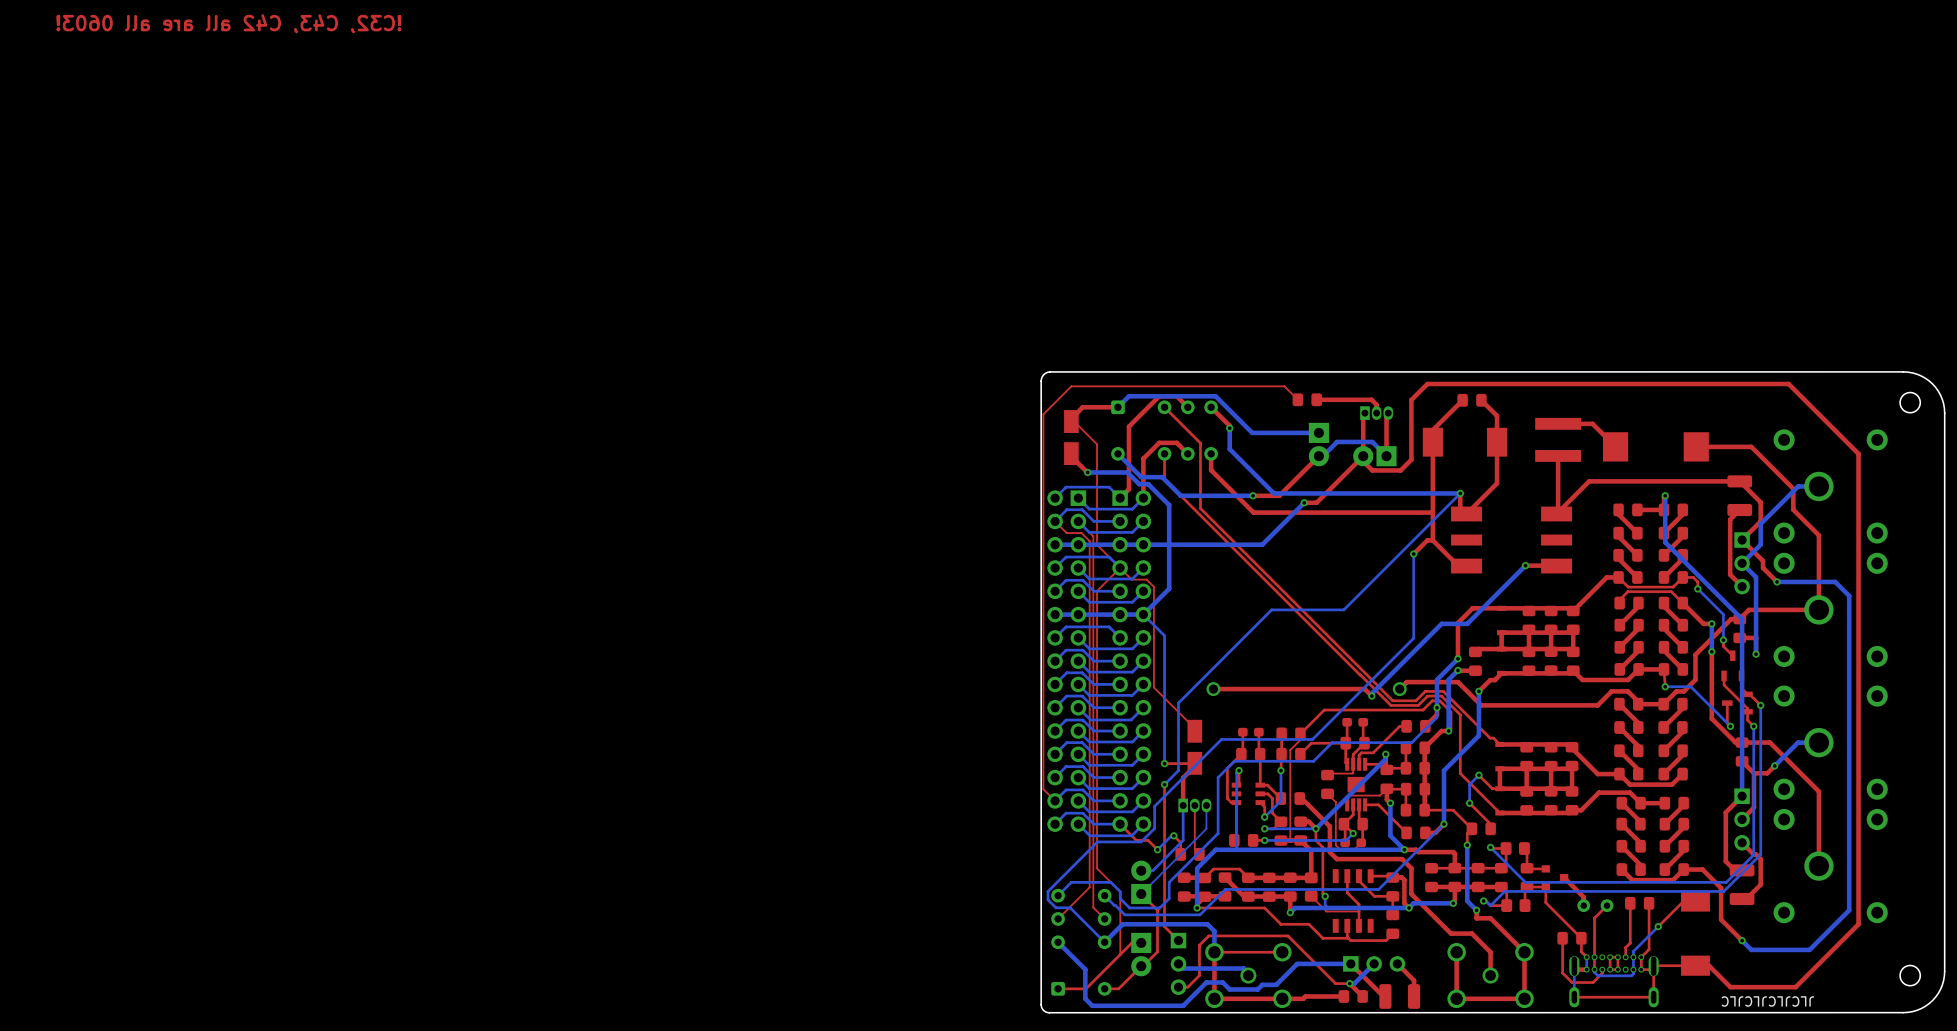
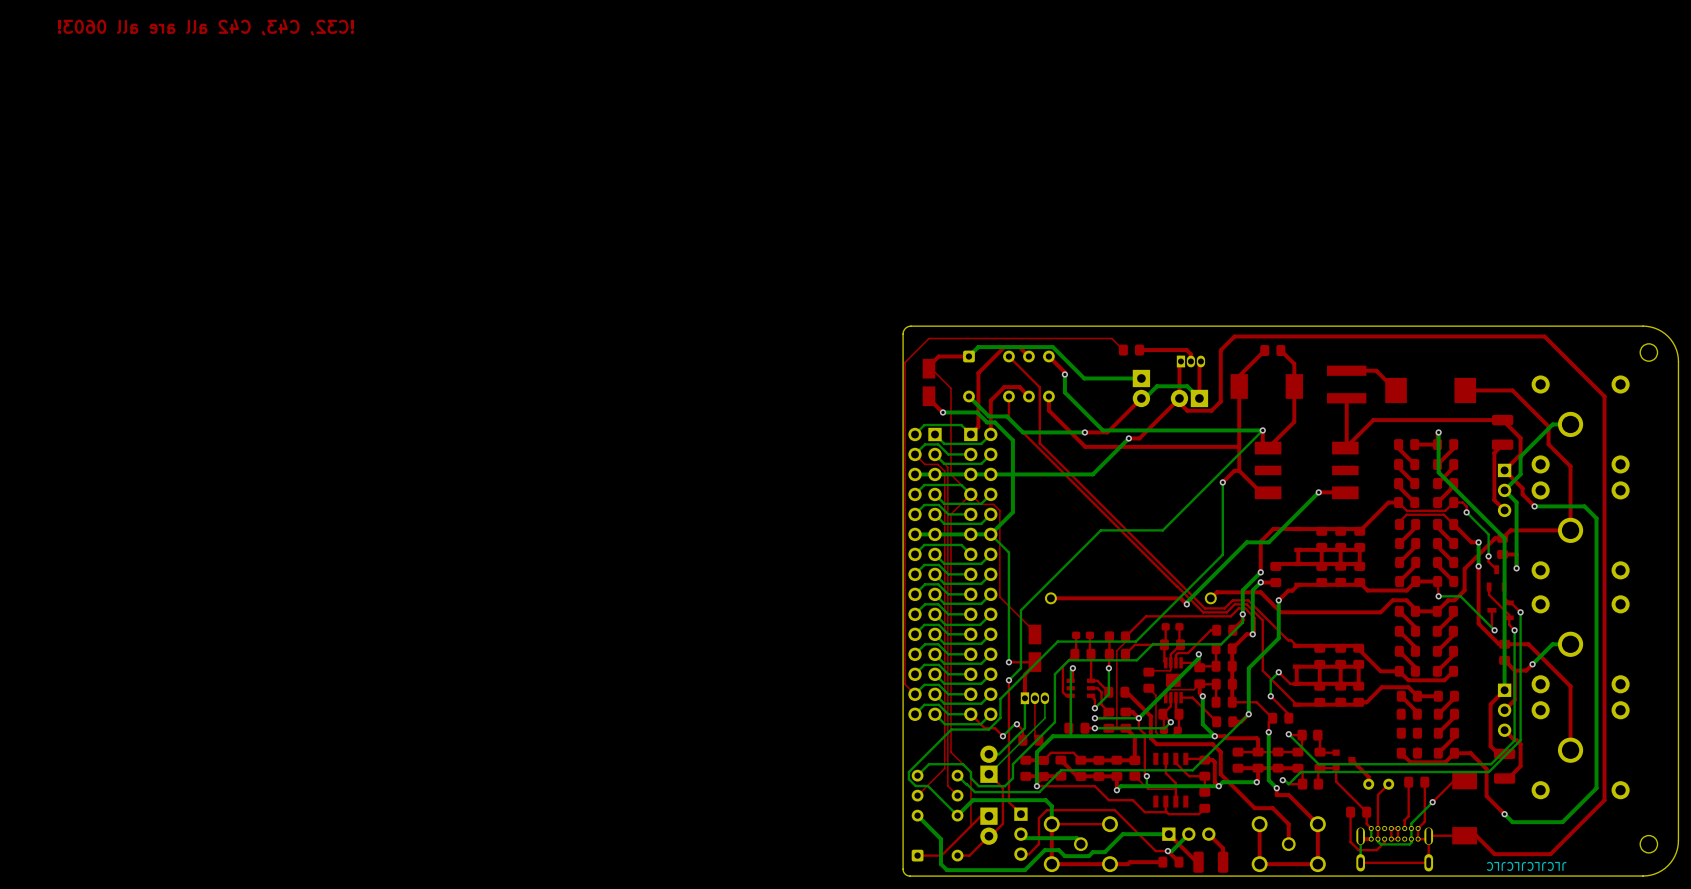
top track: (1621, 824) (1640, 843) -> none
top track: (1621, 846) (1640, 865) -> none

